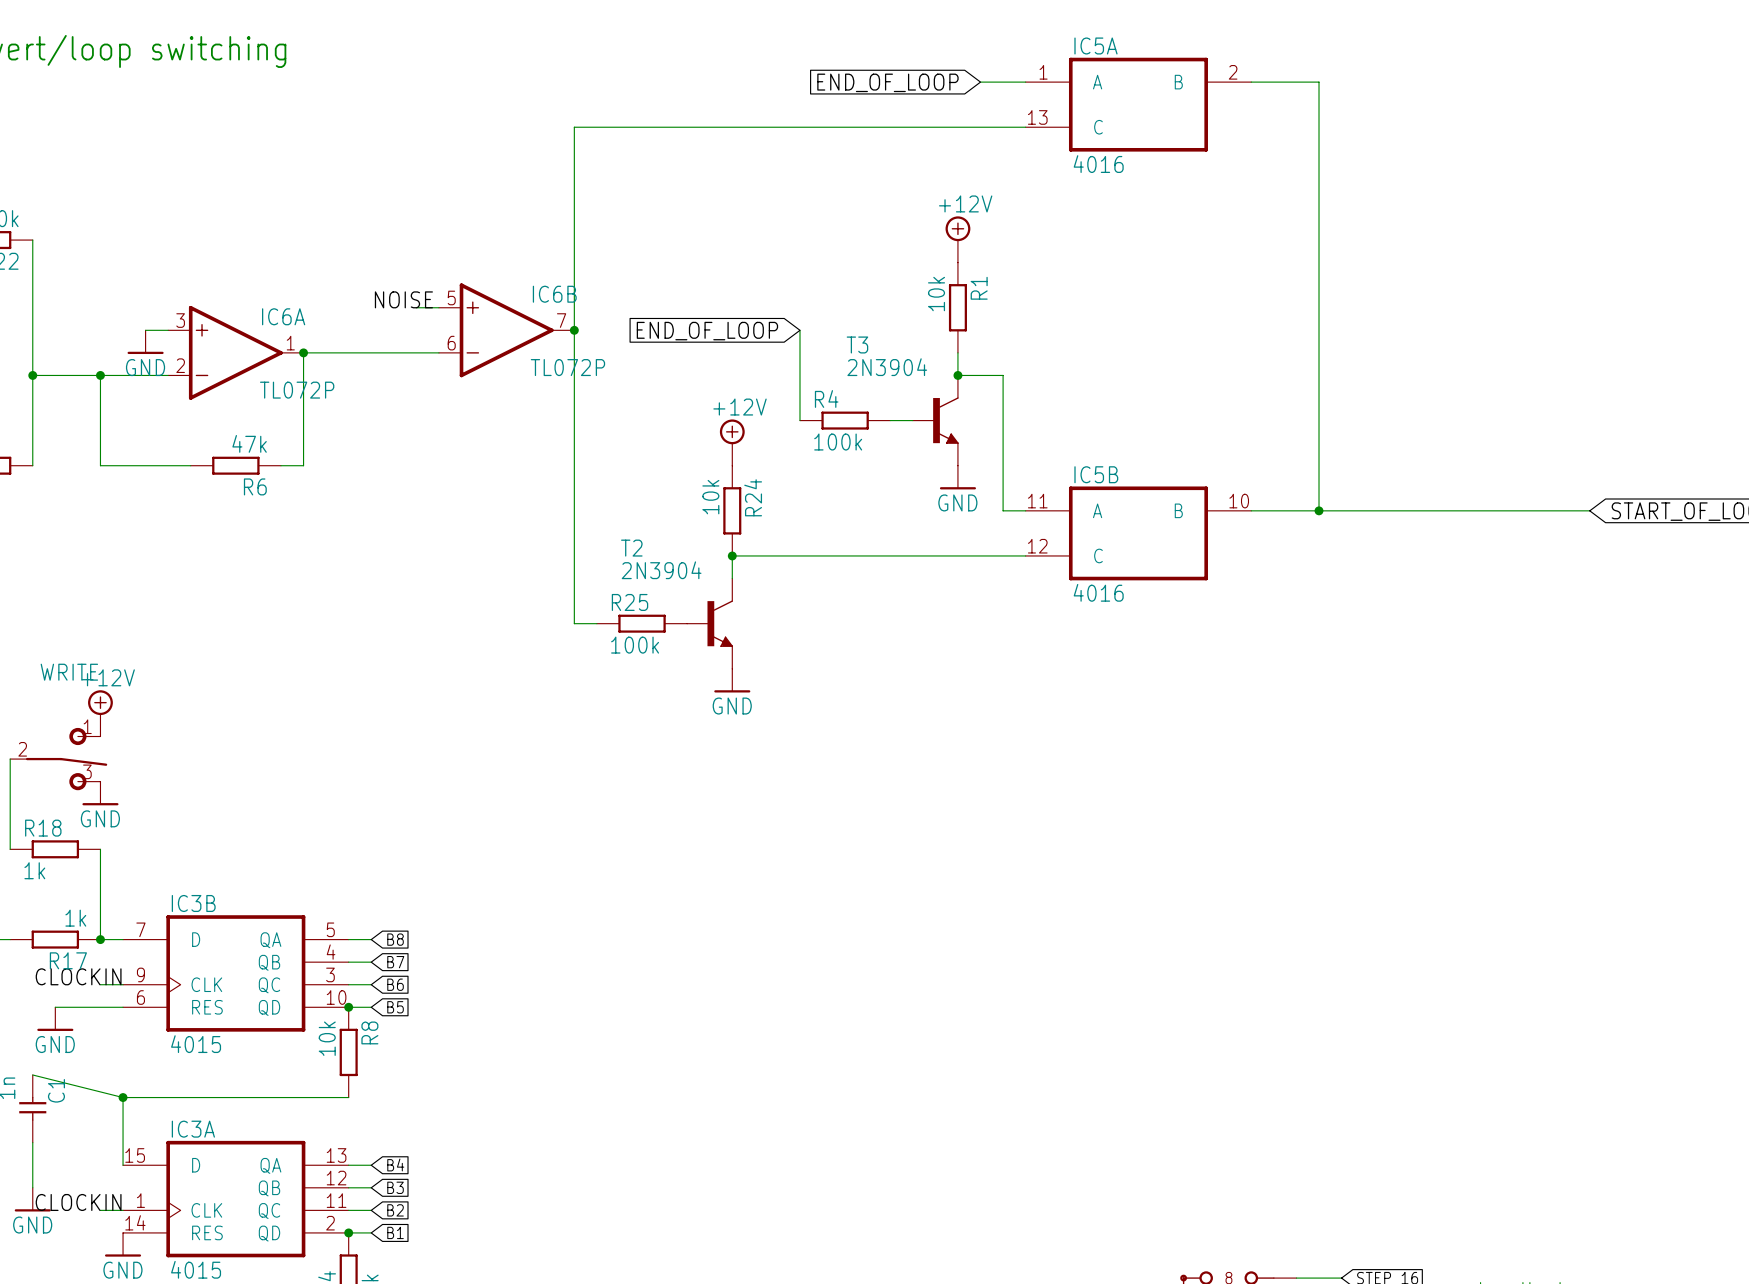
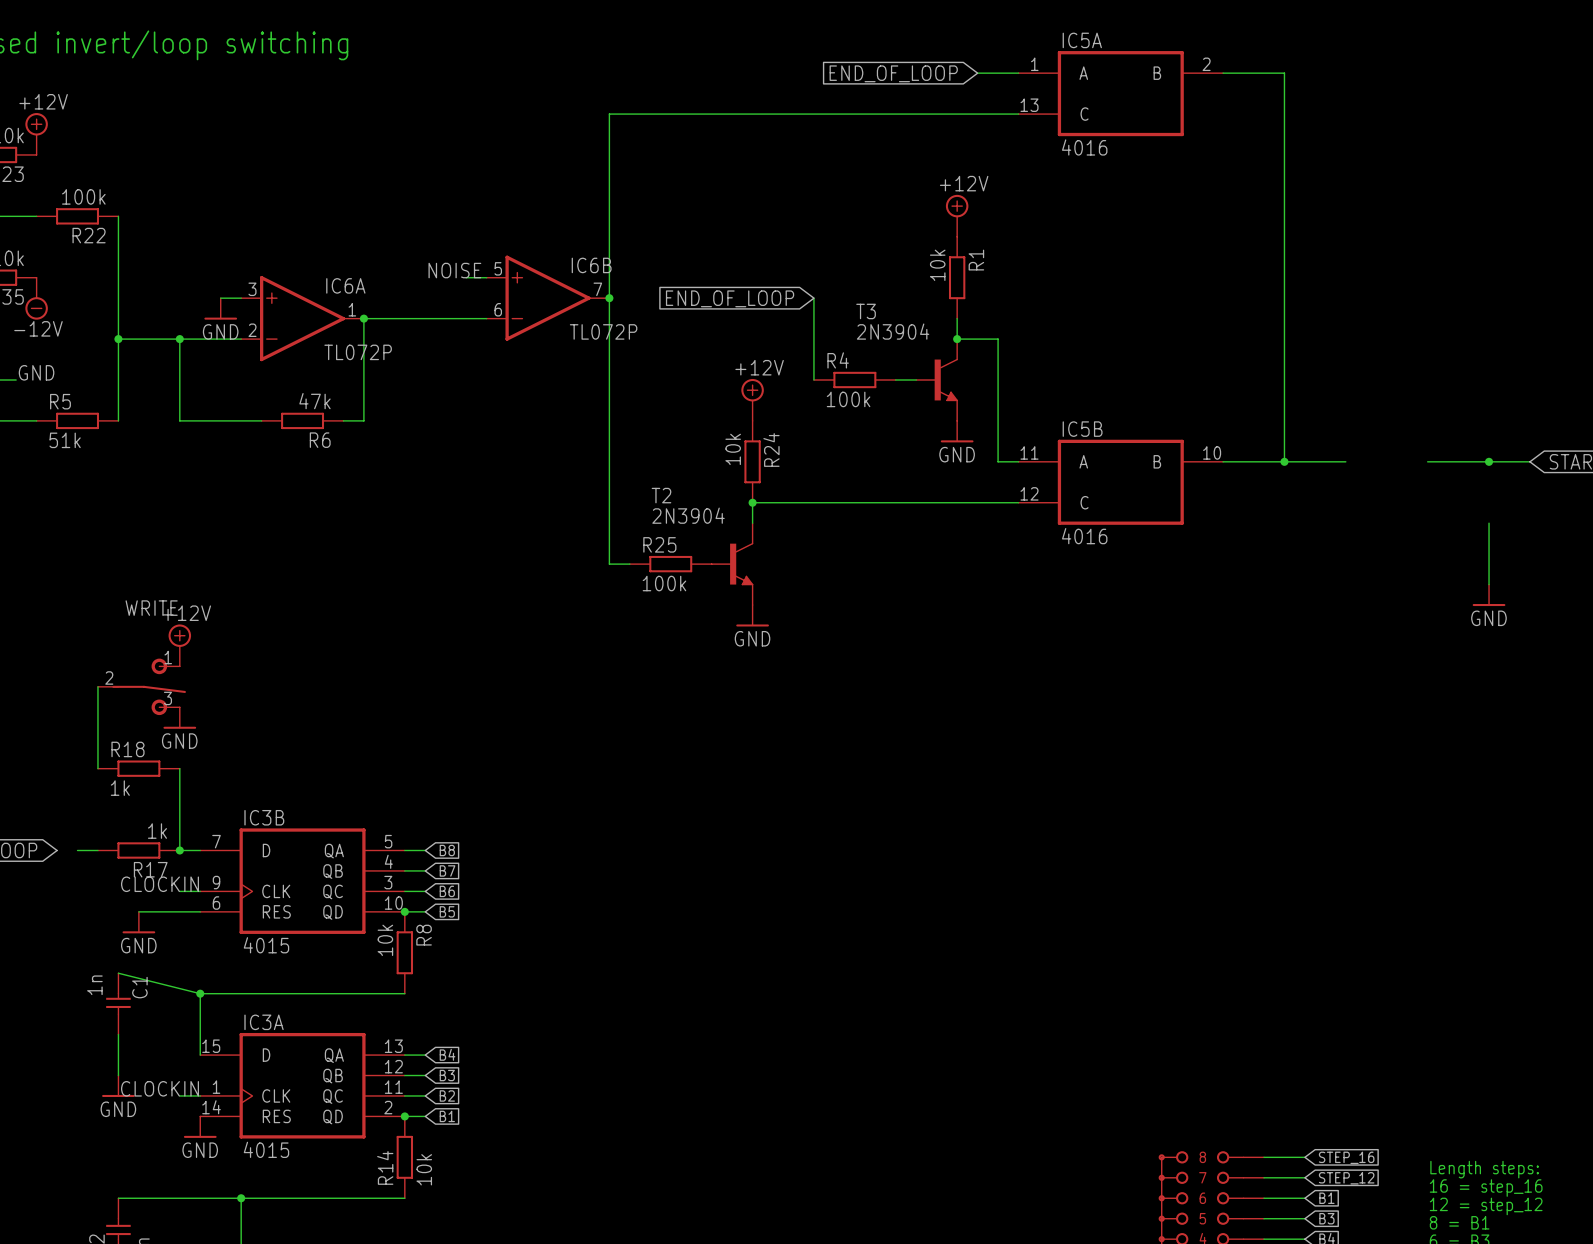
wire: (1386, 510) (1476, 510) -> none
junction: none -> (1489, 461)
wire: none -> (1489, 523) (1489, 584)
power symbol: none -> GND (1489, 595)

